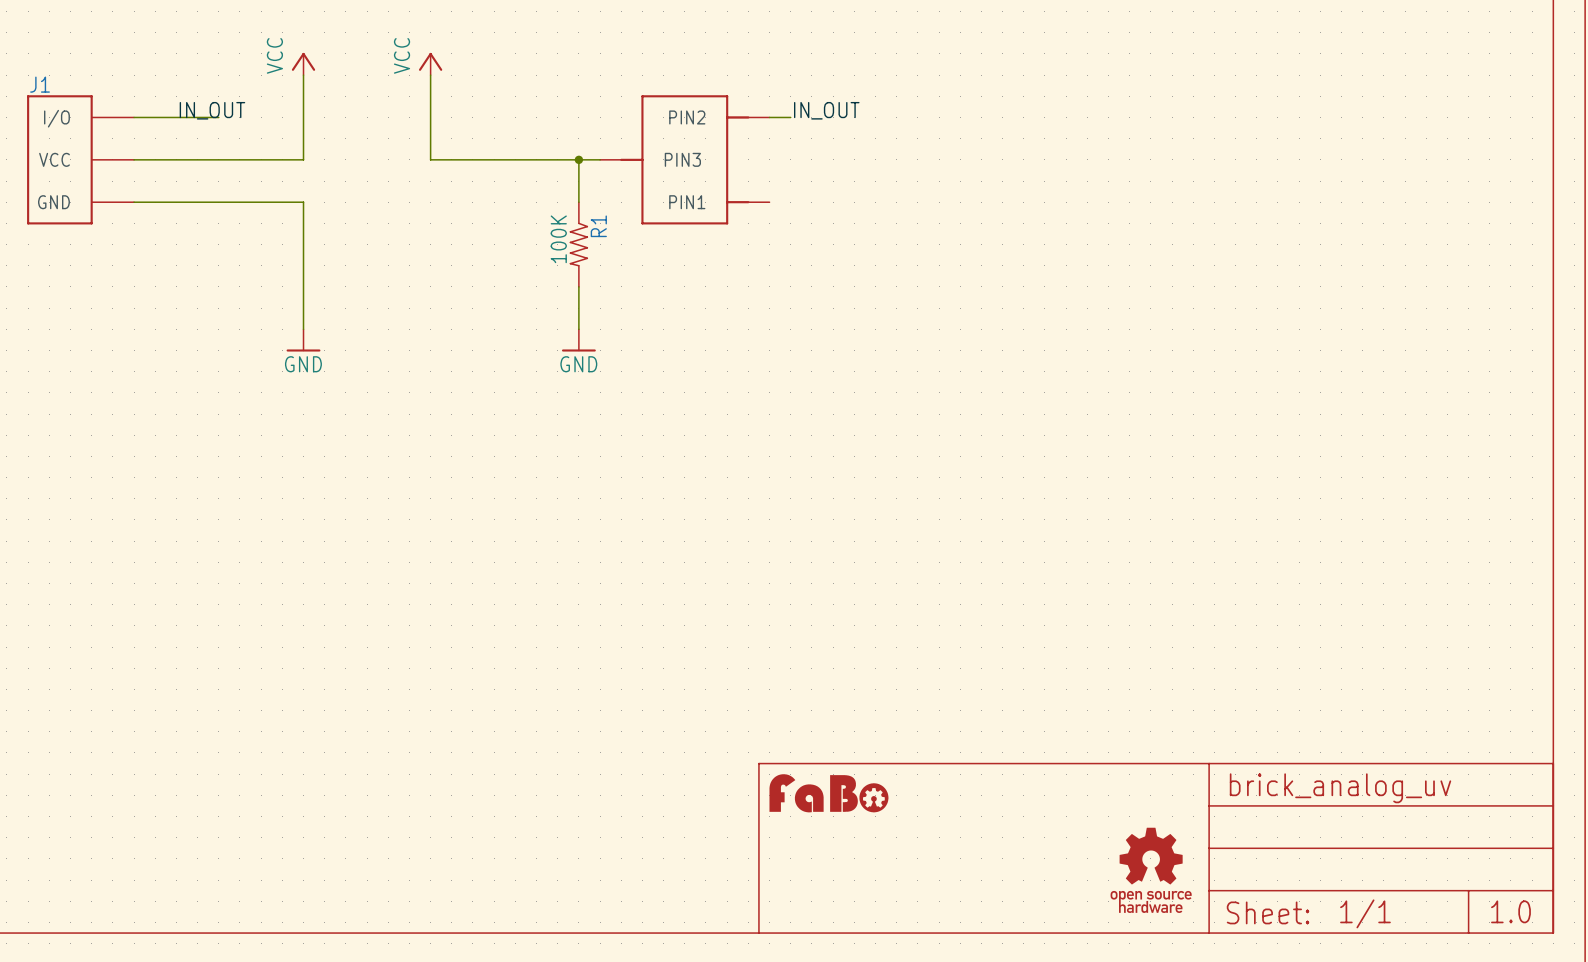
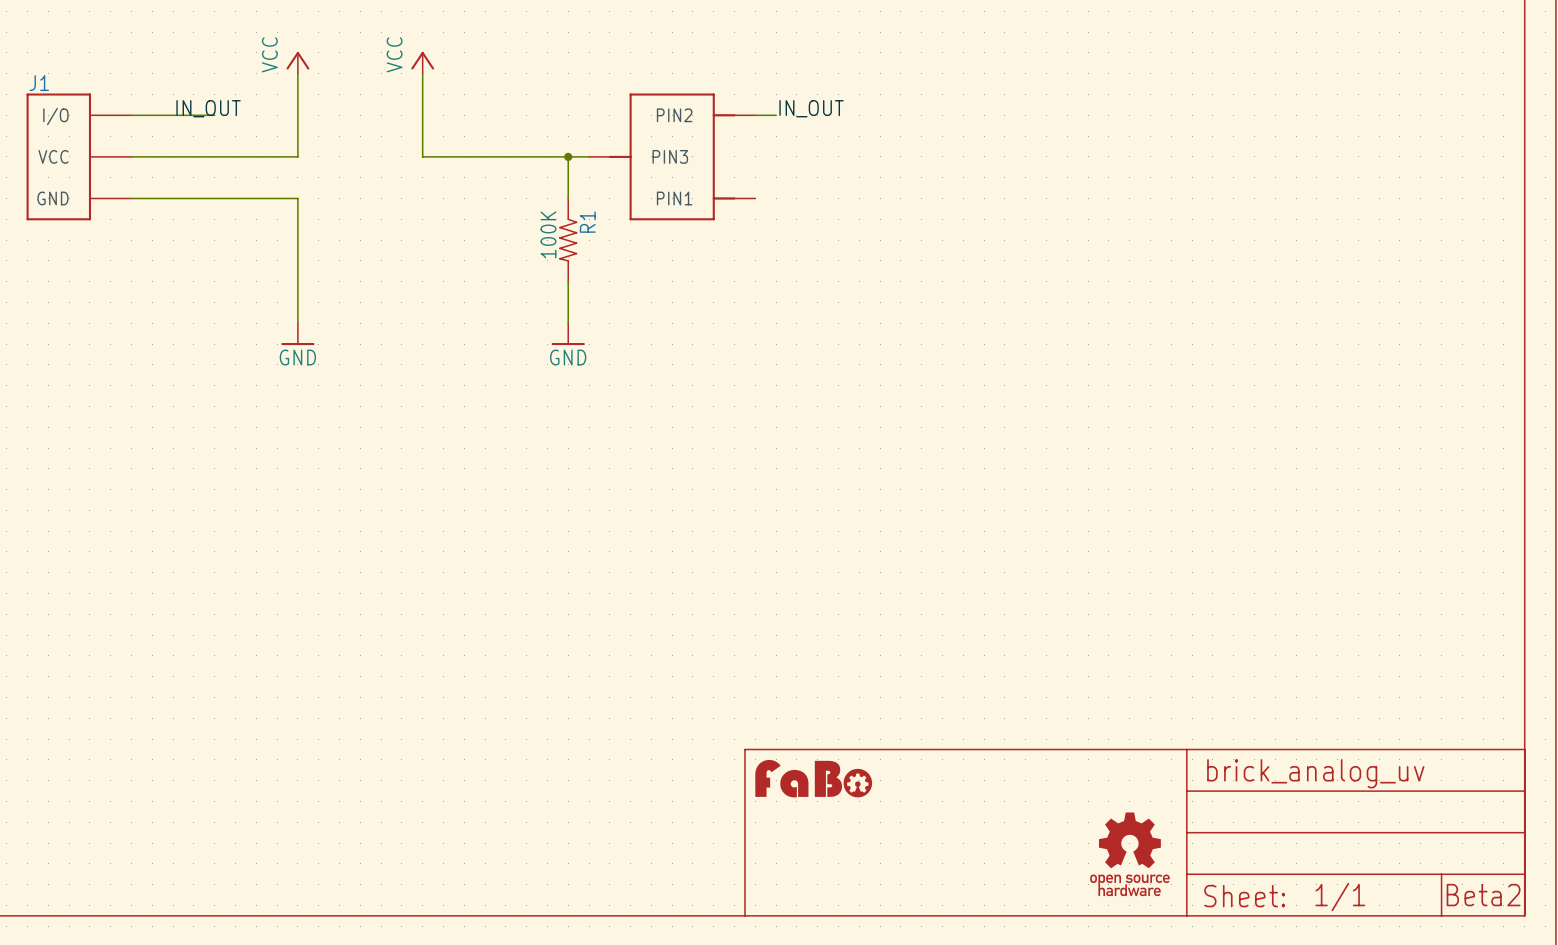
text: 1.0 (1510, 911) -> Beta2 (1483, 895)

